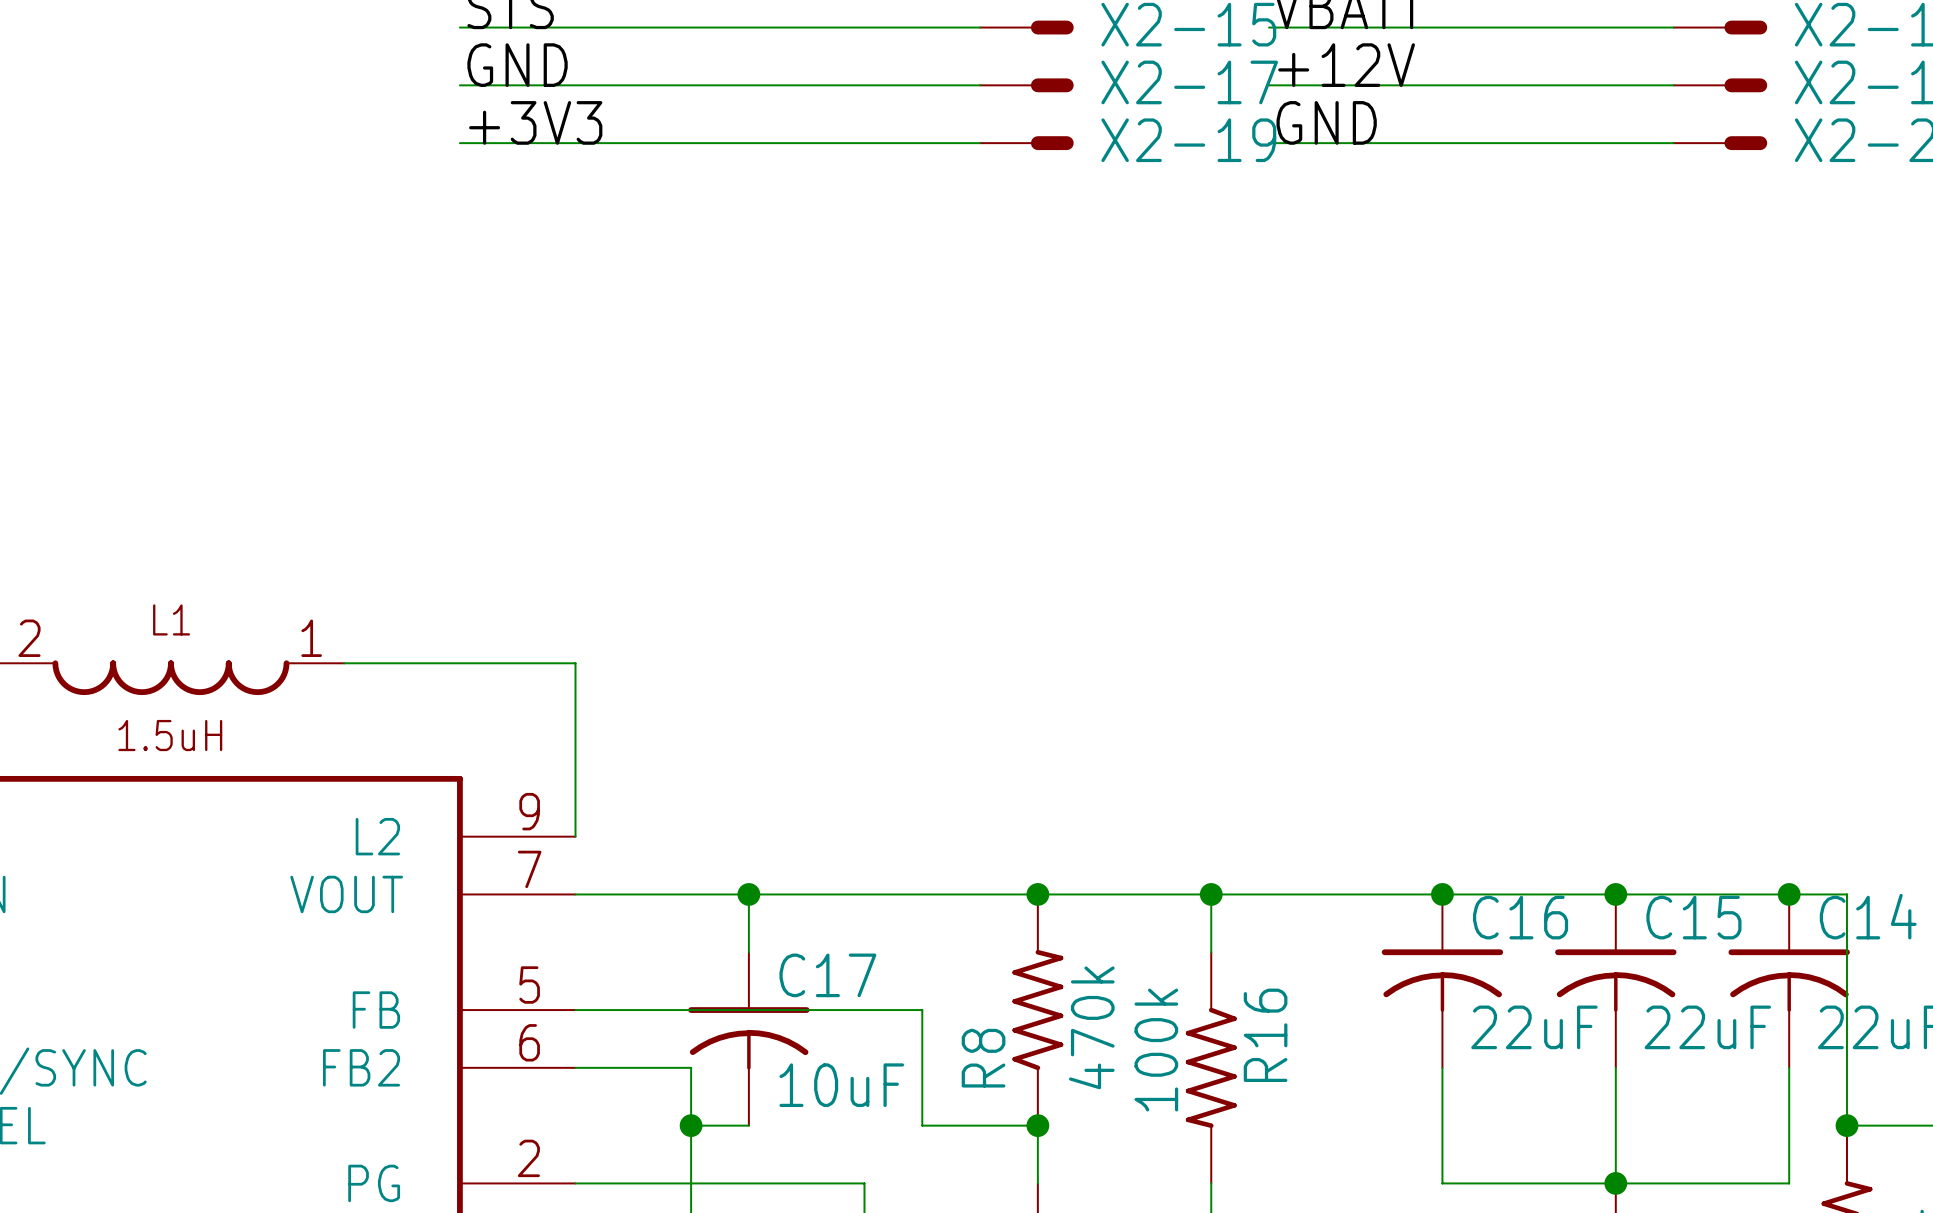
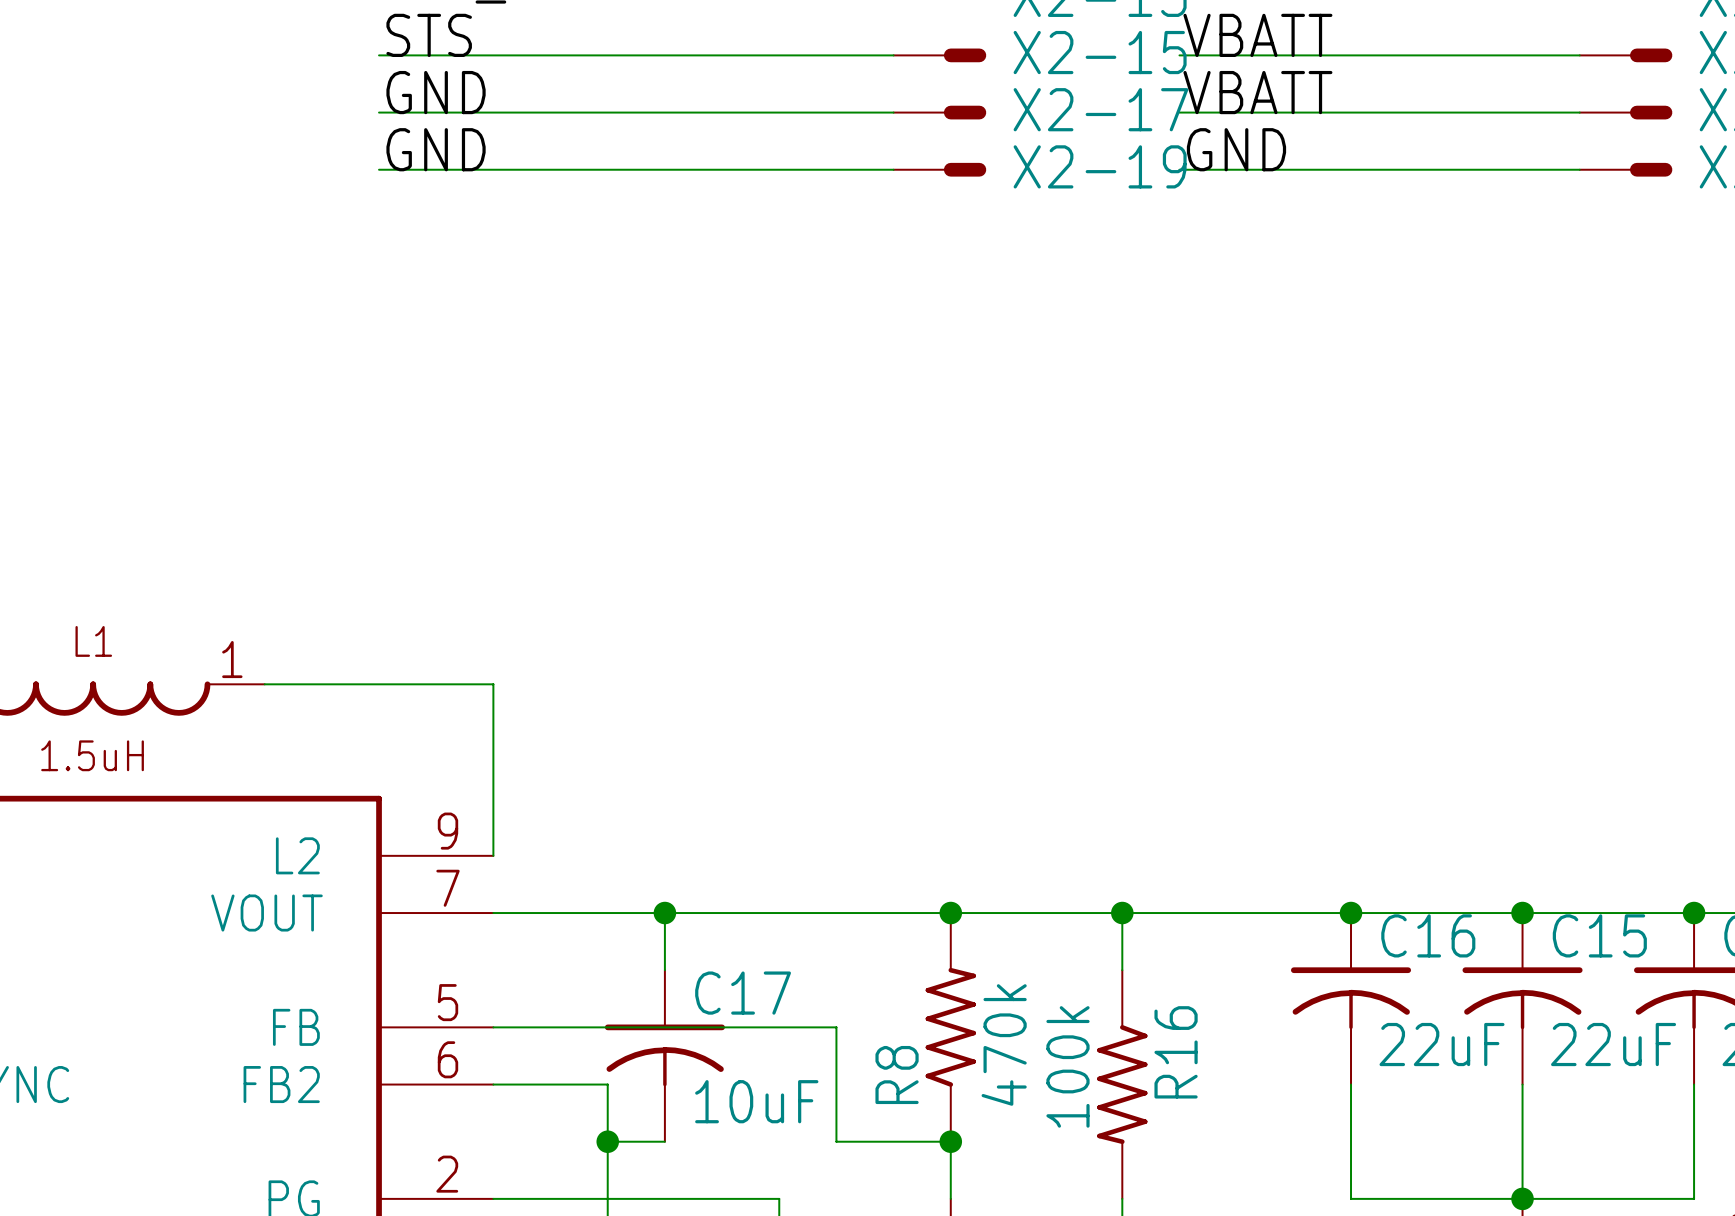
label: +12V (1346, 65) -> VBATT (1257, 92)
label: +3V3 (535, 122) -> GND (436, 149)

